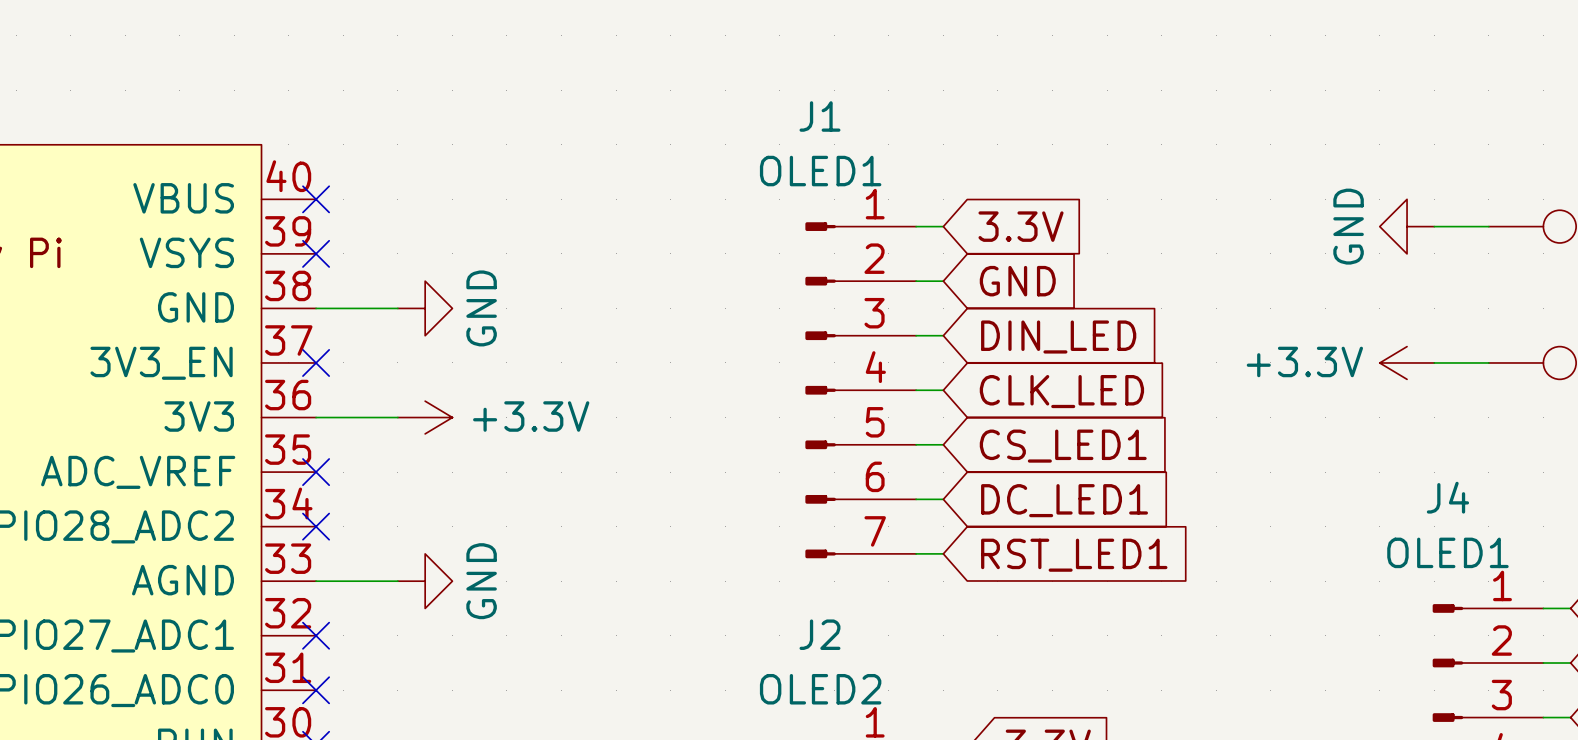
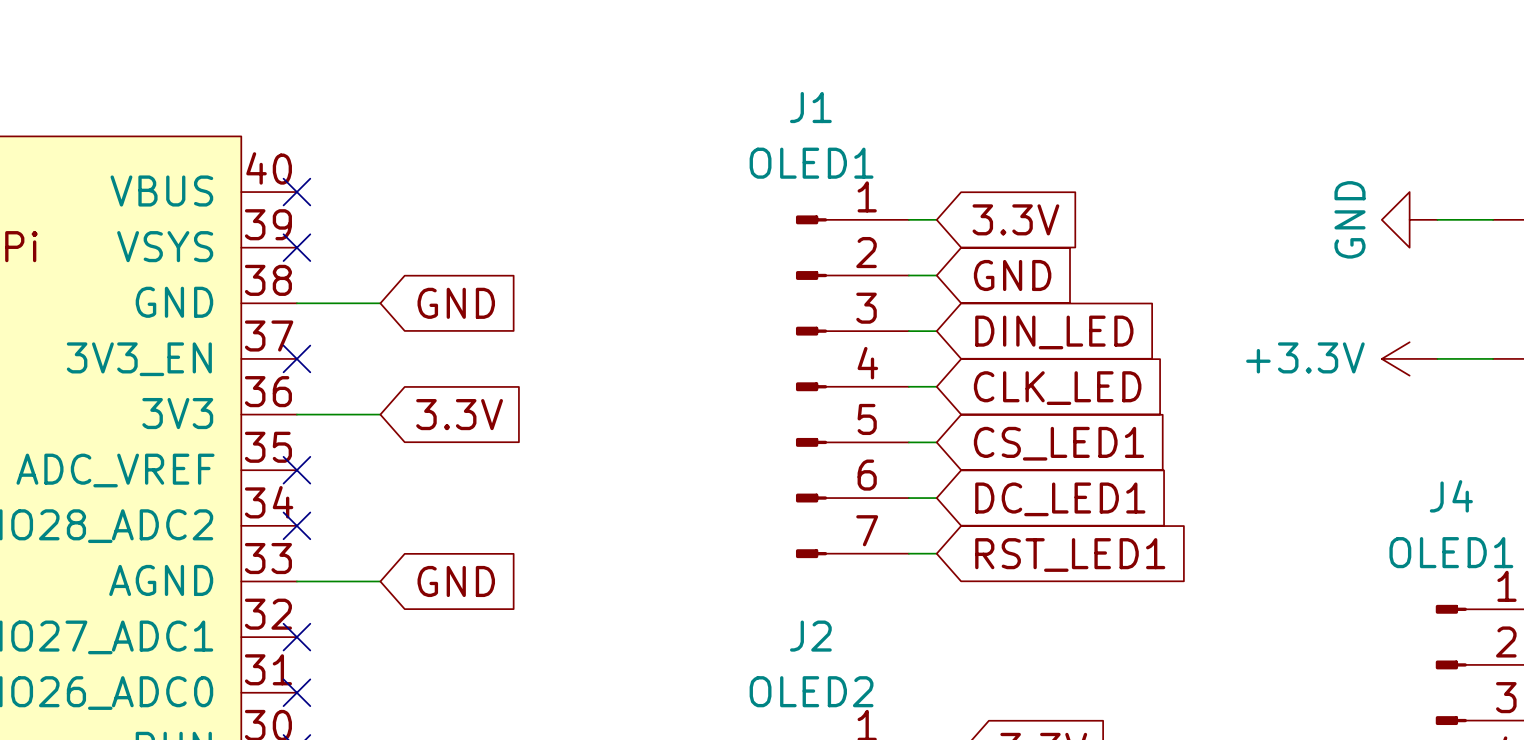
power symbol: GND (425, 308) -> none
global label: none -> GND (456, 303)
power symbol: +3.3V (425, 417) -> none
global label: none -> 3.3V (459, 414)
power symbol: GND (425, 581) -> none
global label: none -> GND (456, 581)

